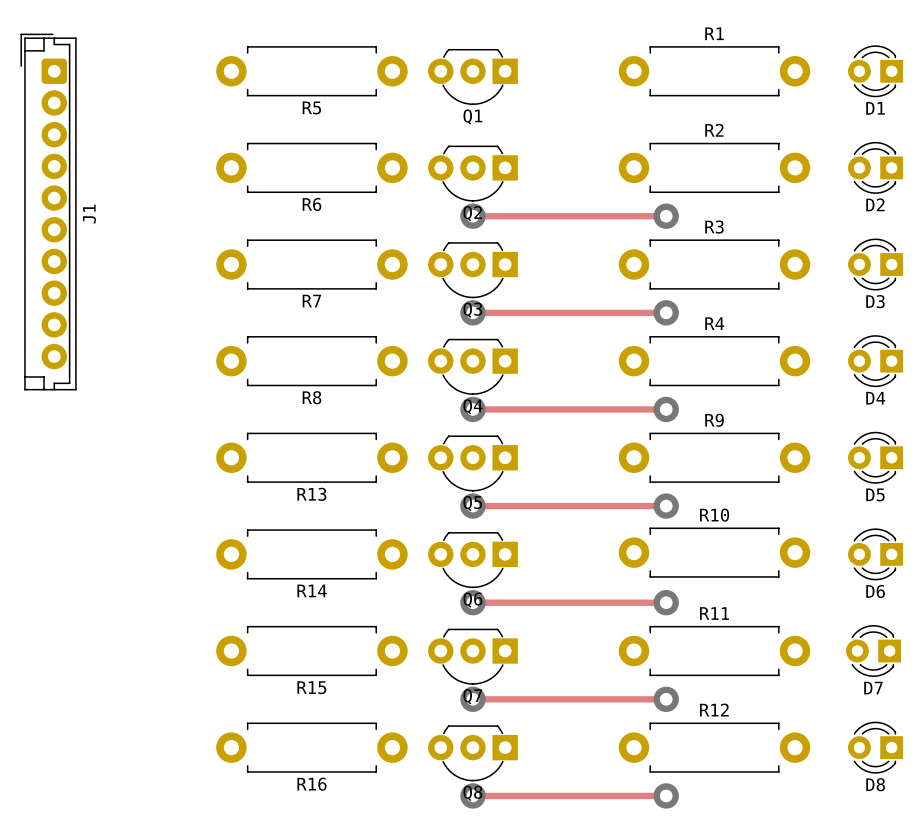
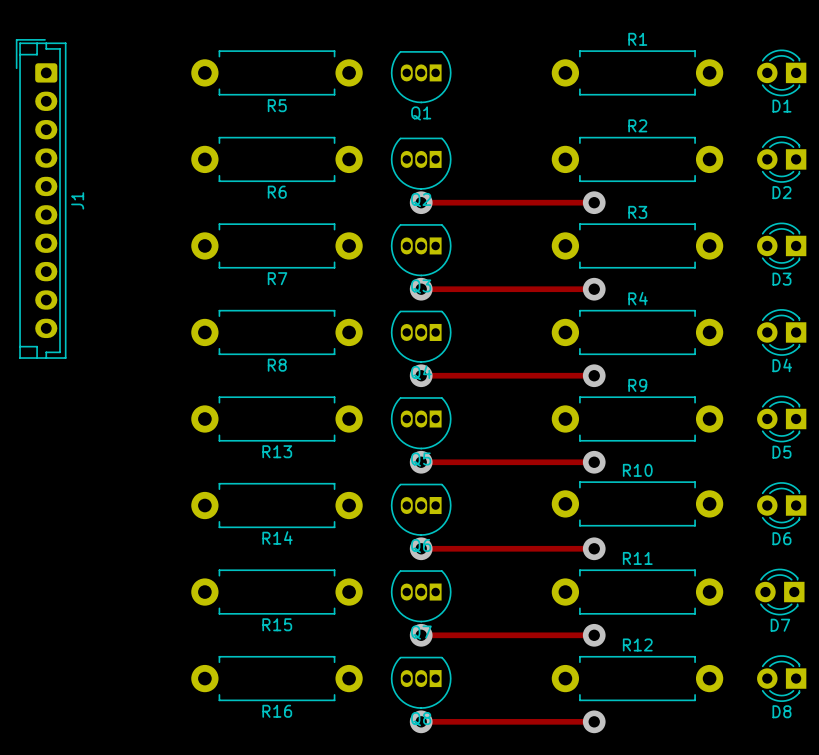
J1 footprint: [20, 33, 77, 391] -> [15, 39, 67, 359]
Q1 footprint: [428, 48, 518, 106] -> [390, 51, 452, 104]
Q2 footprint: [428, 145, 518, 202] -> [390, 137, 452, 190]
Q3 footprint: [428, 242, 518, 299] -> [390, 224, 452, 277]
Q4 footprint: [428, 338, 518, 395] -> [390, 310, 452, 363]
Q5 footprint: [428, 435, 518, 492] -> [390, 397, 452, 450]
Q6 footprint: [428, 532, 518, 589] -> [390, 483, 452, 536]
Q7 footprint: [428, 628, 518, 685] -> [390, 570, 452, 623]
Q8 footprint: [428, 725, 518, 782] -> [390, 656, 452, 709]

